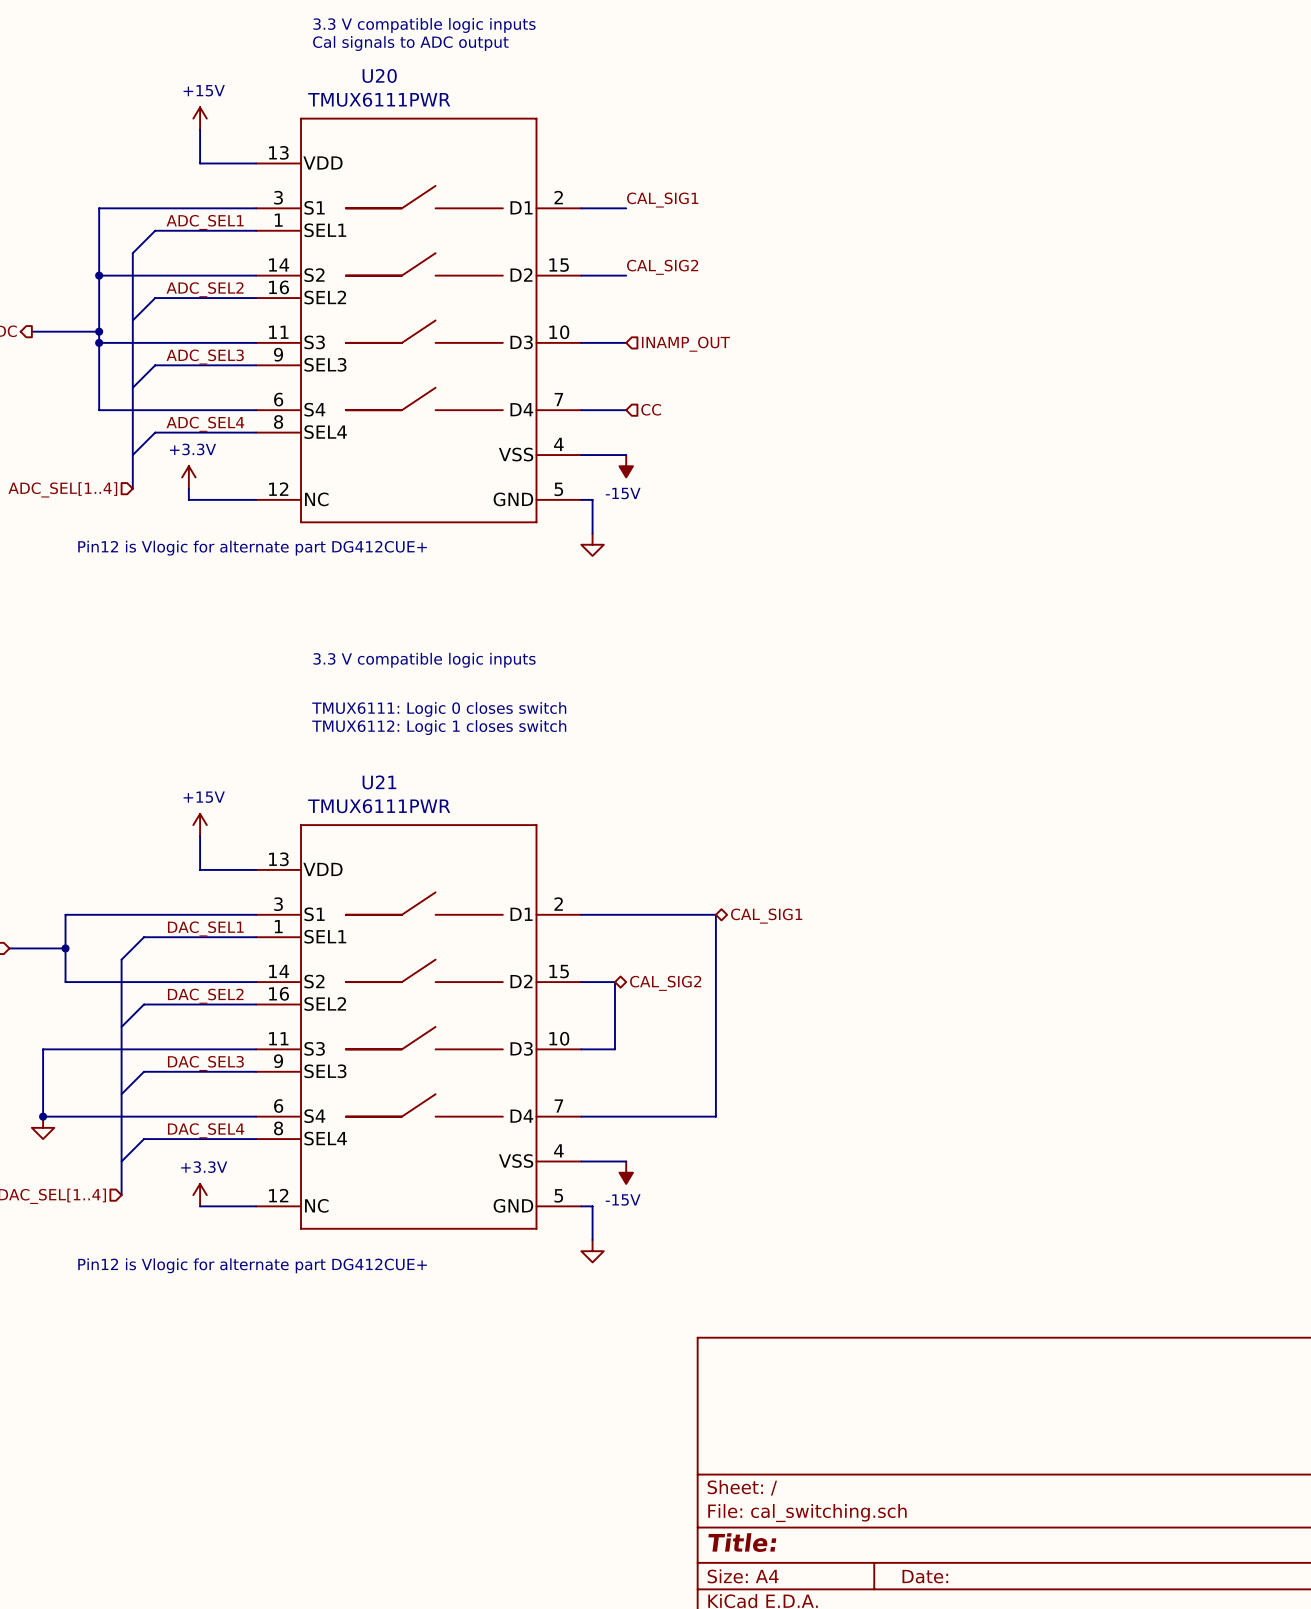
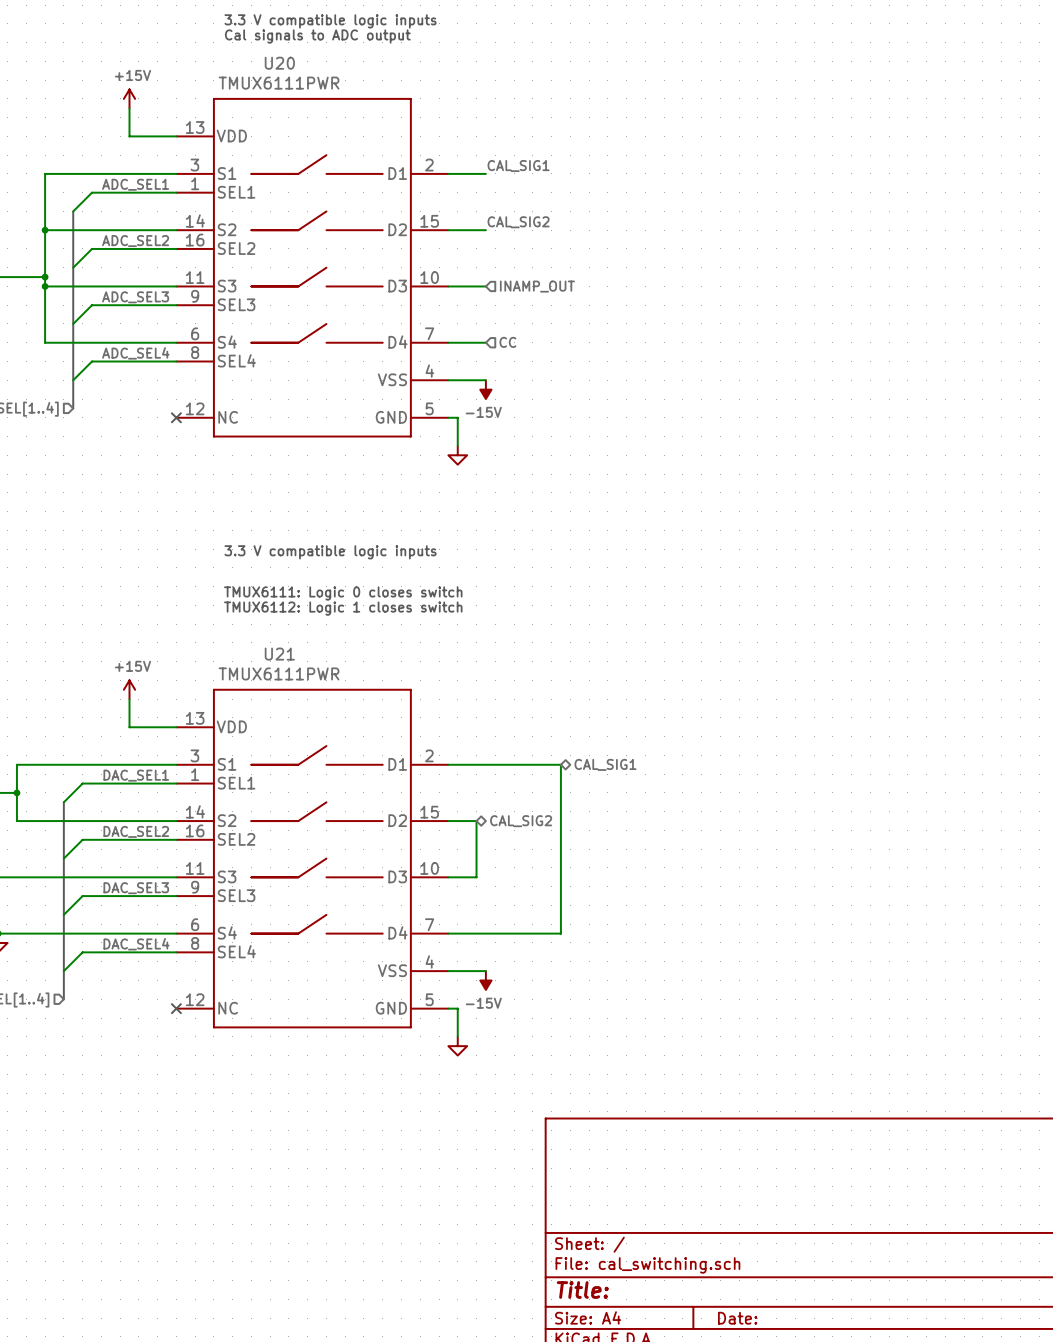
power symbol: +3.3V (188, 477) -> none
wire: (188, 488) (188, 499) (256, 499) -> none
no-connect mark: none -> (176, 417)
text: Pin12 is Vlogic for alternate part DG412CUE+ (252, 548) -> none
power symbol: +3.3V (200, 1195) -> none
wire: (200, 1206) (256, 1206) -> none
no-connect mark: none -> (176, 1008)
text: Pin12 is Vlogic for alternate part DG412CUE+ (252, 1265) -> none

